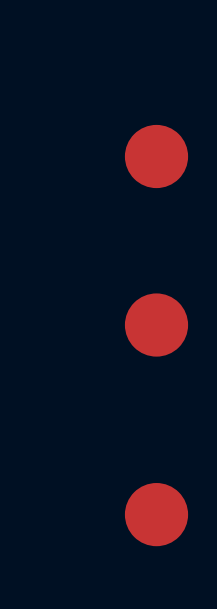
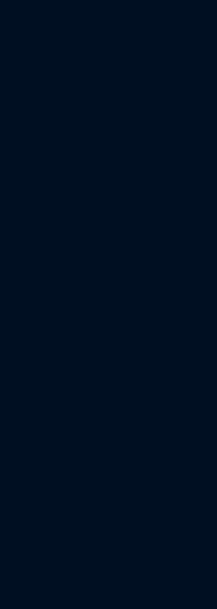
part: (156, 156) -> none
part: (156, 325) -> none
part: (156, 514) -> none

